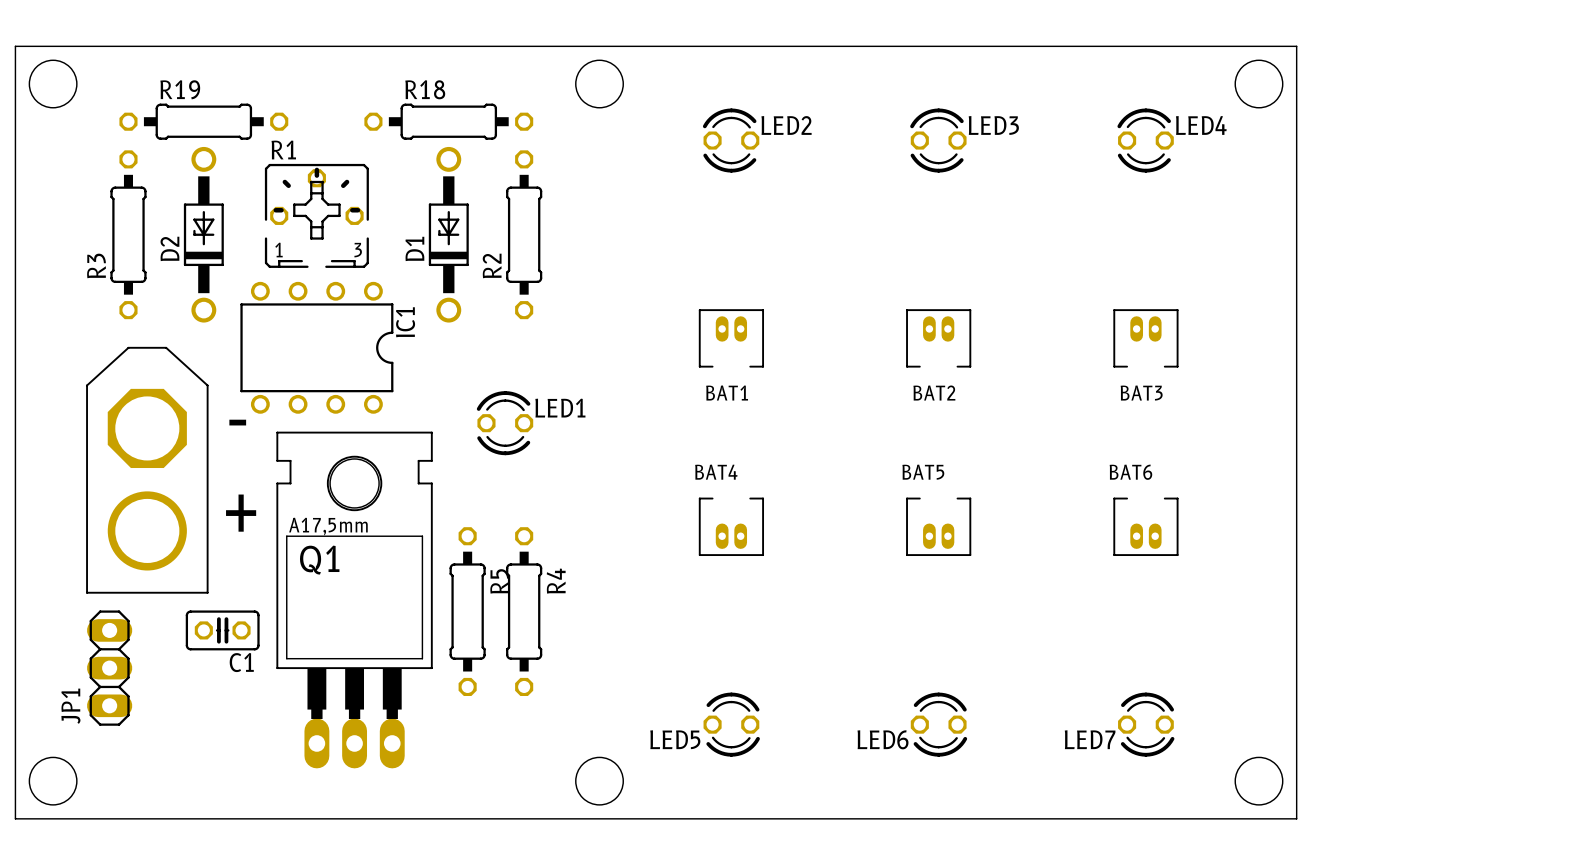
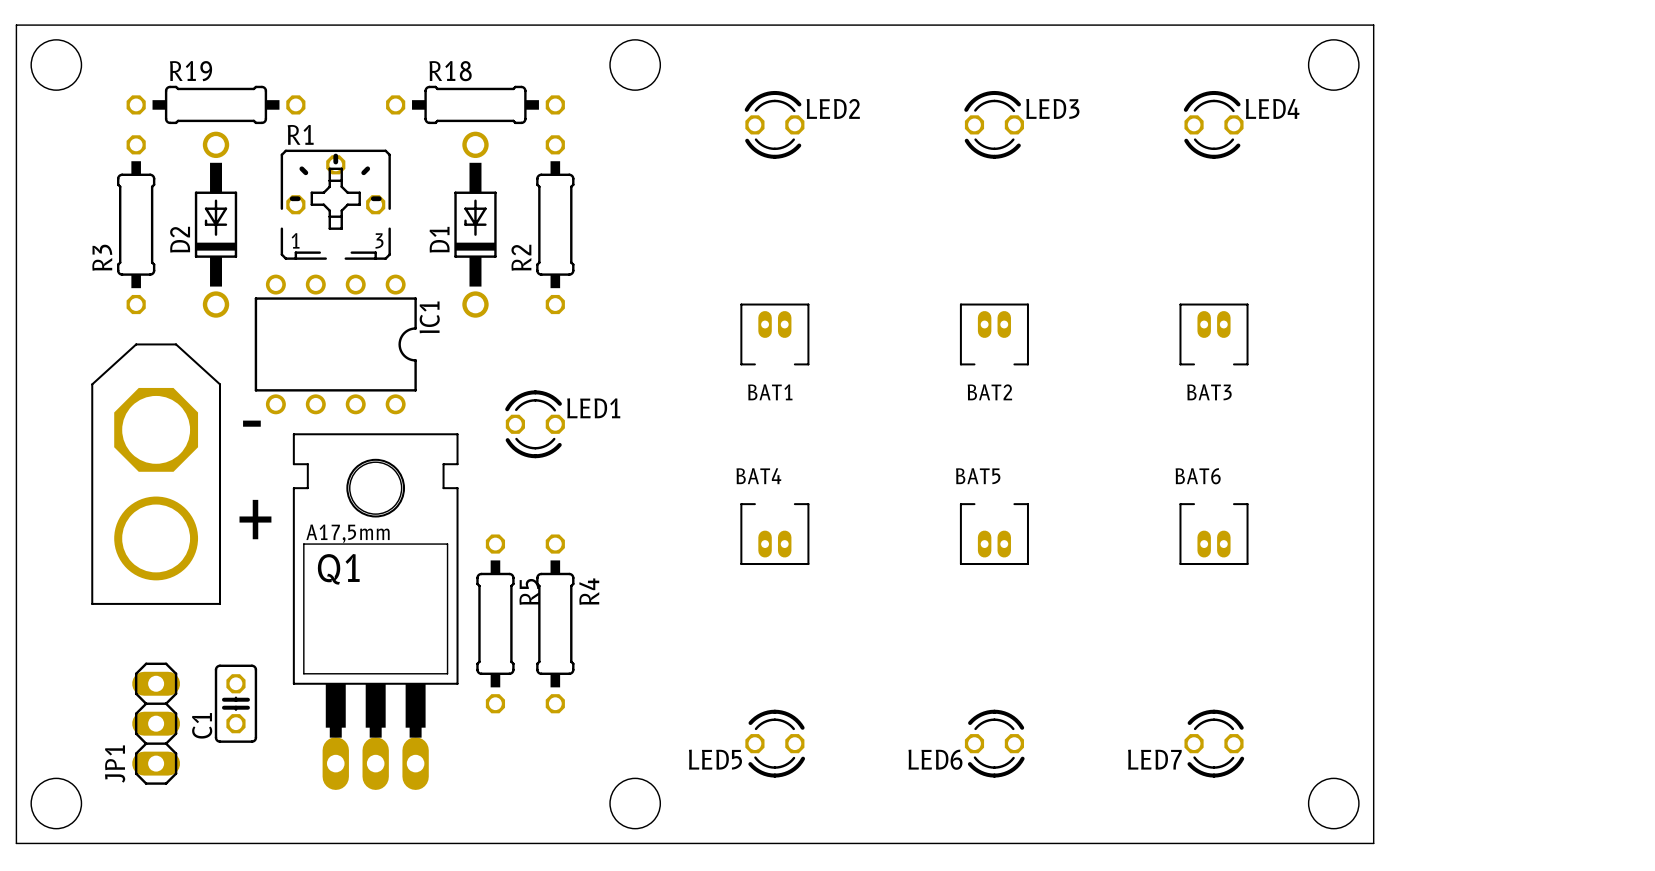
C1 rotation: 0° (222, 630) -> 90° clockwise (235, 703)
C1 position: (222, 630) -> (235, 703)
JP1 position: (109, 668) -> (156, 723)

